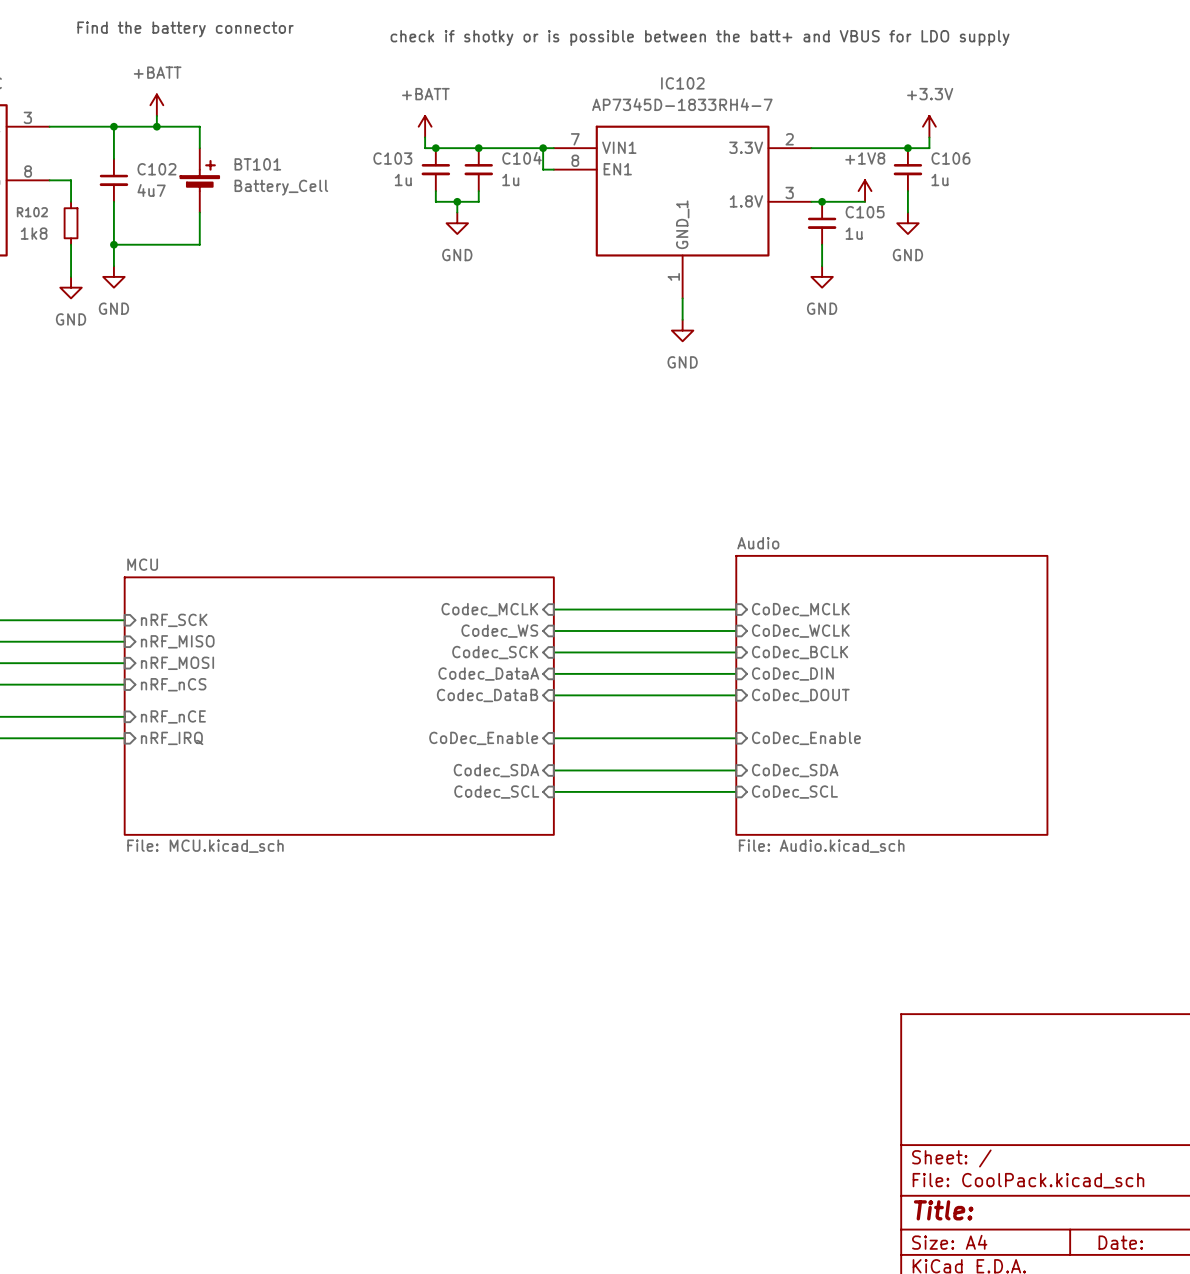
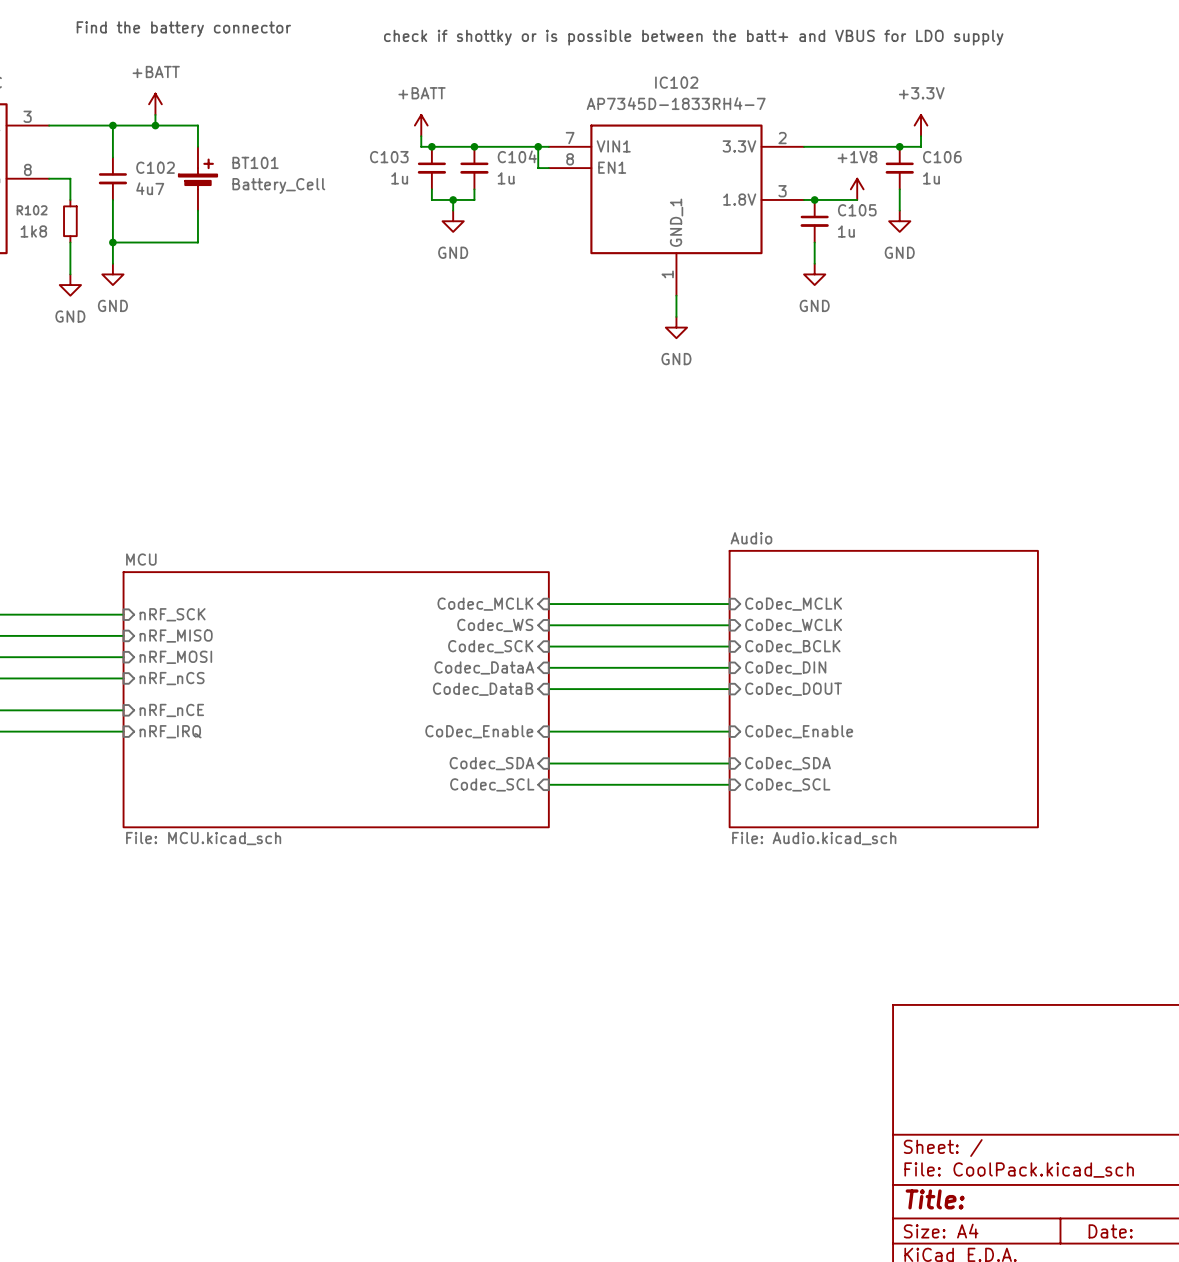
text: check if shotky or is possible between the batt+ and VBUS for LDO supply (700, 37) -> check if shottky or is possible between the batt+ and VBUS for LDO supply (693, 37)

